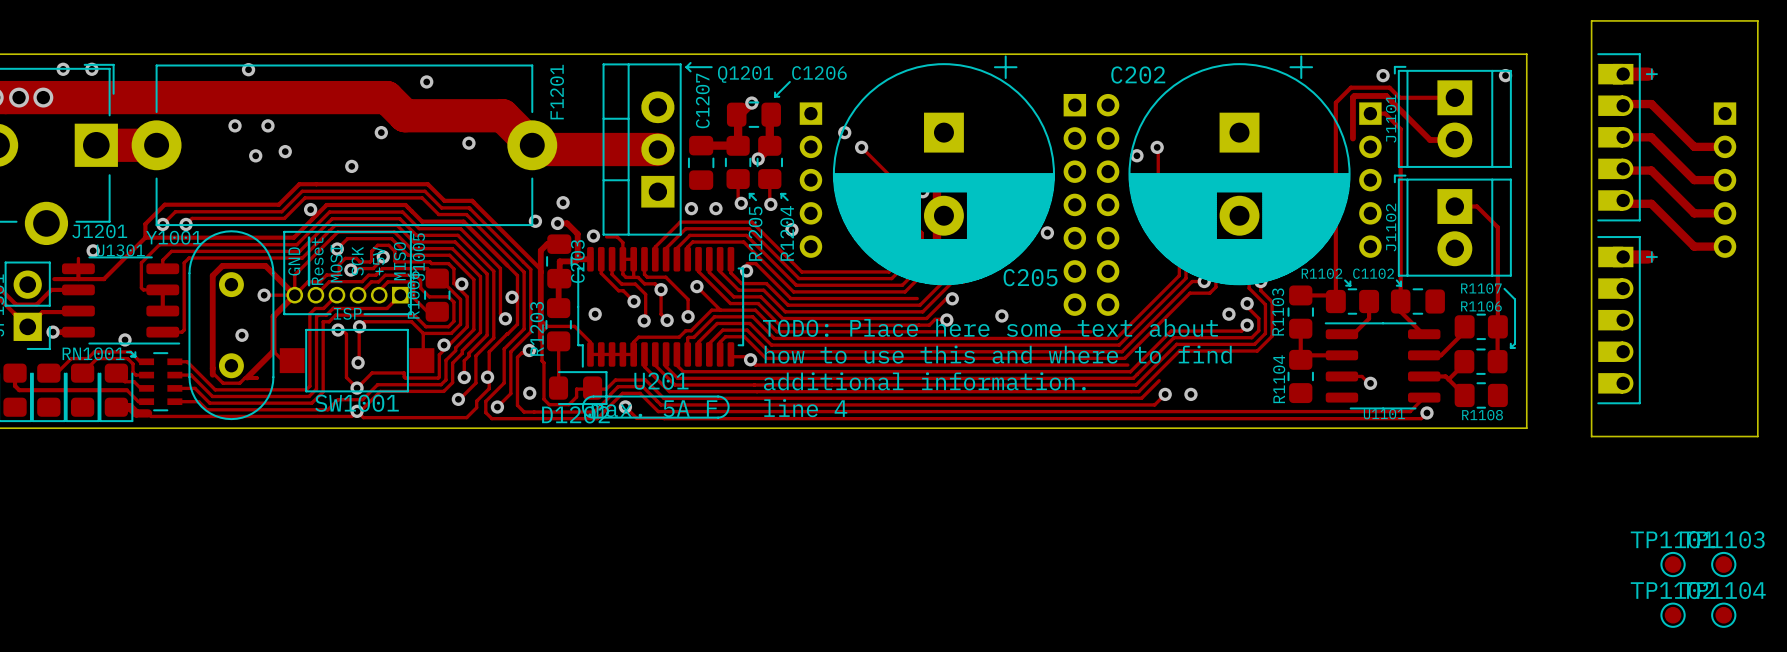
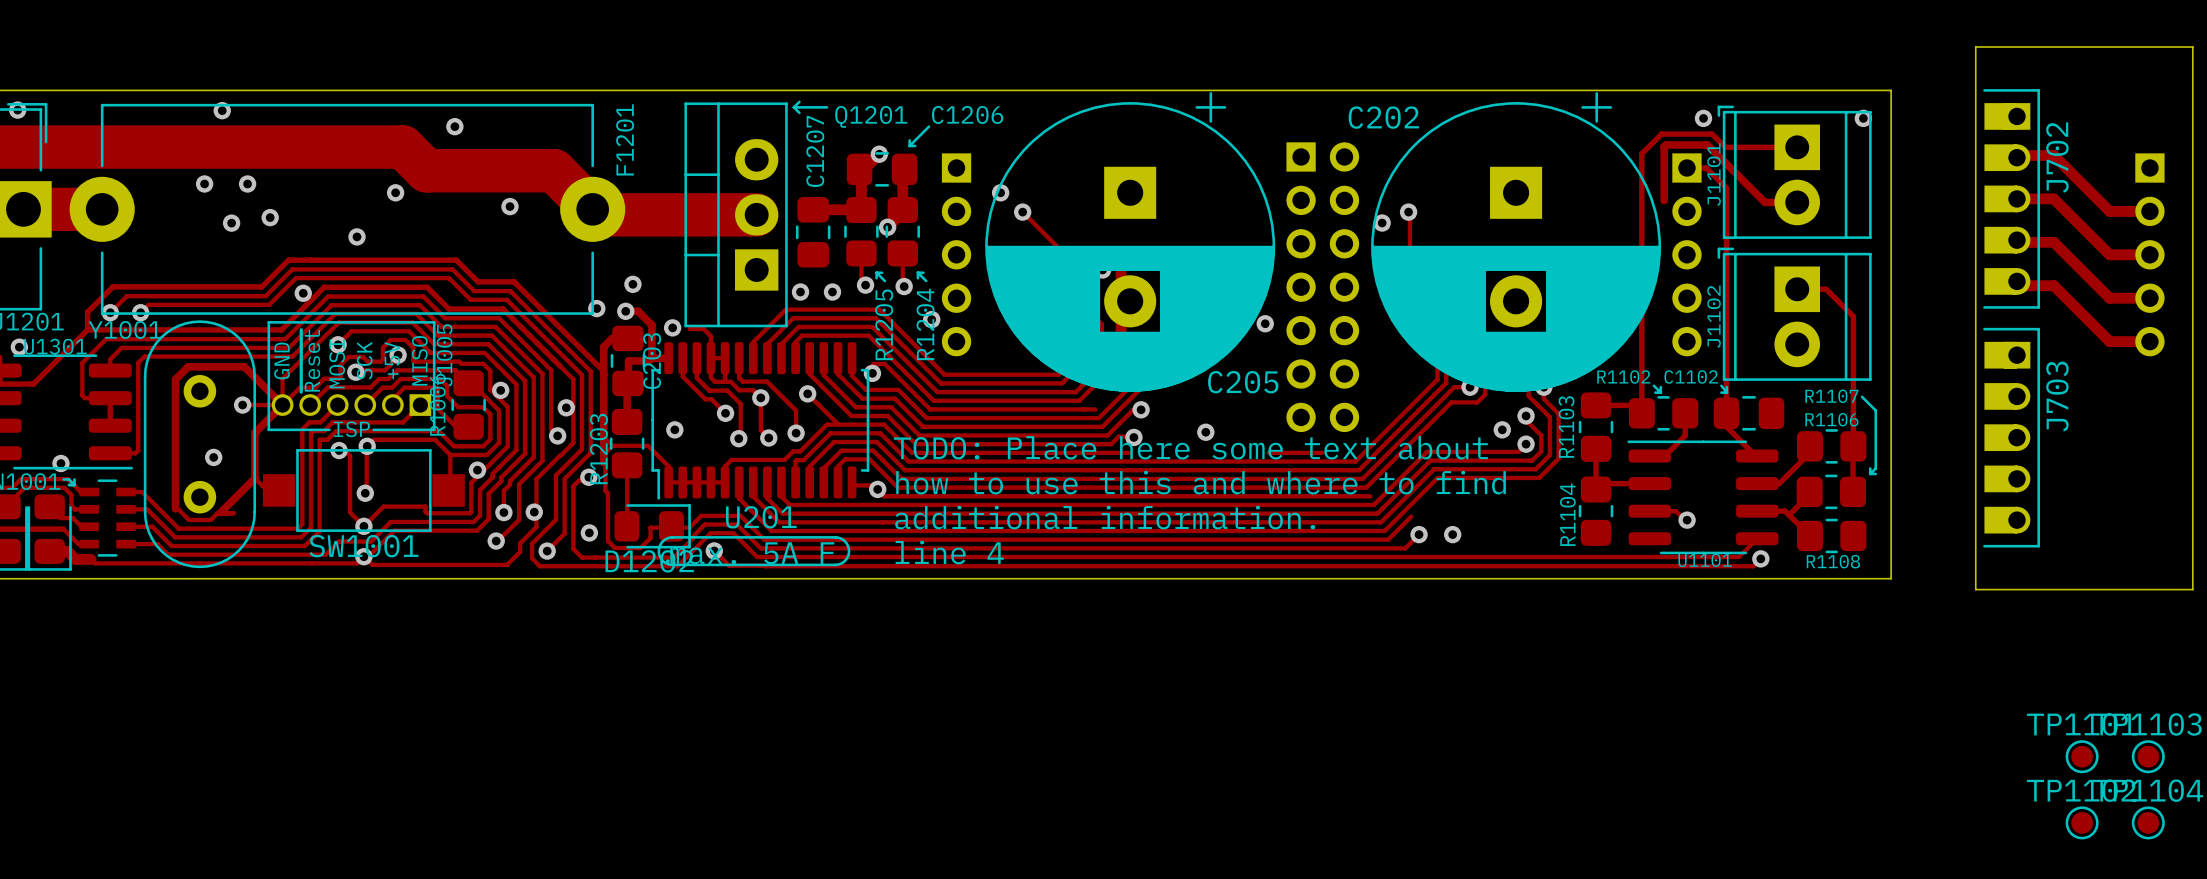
track: (1623, 74) (1648, 74) -> none
text: + (1651, 74) -> none
J702 name: none -> J702 (2057, 157)
track: (1623, 257) (1648, 257) -> none
text: + (1651, 257) -> none
J703 name: none -> J703 (2057, 396)

